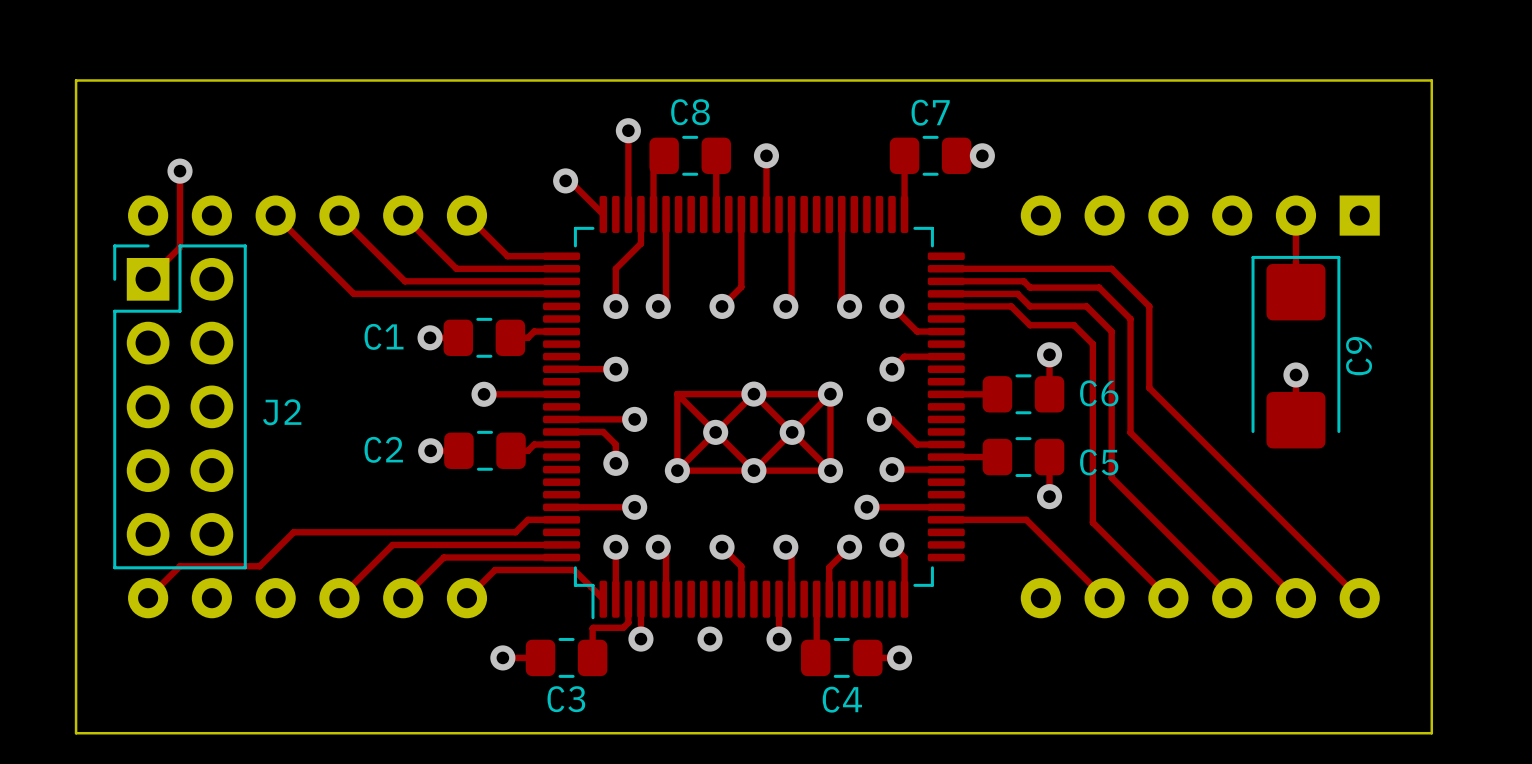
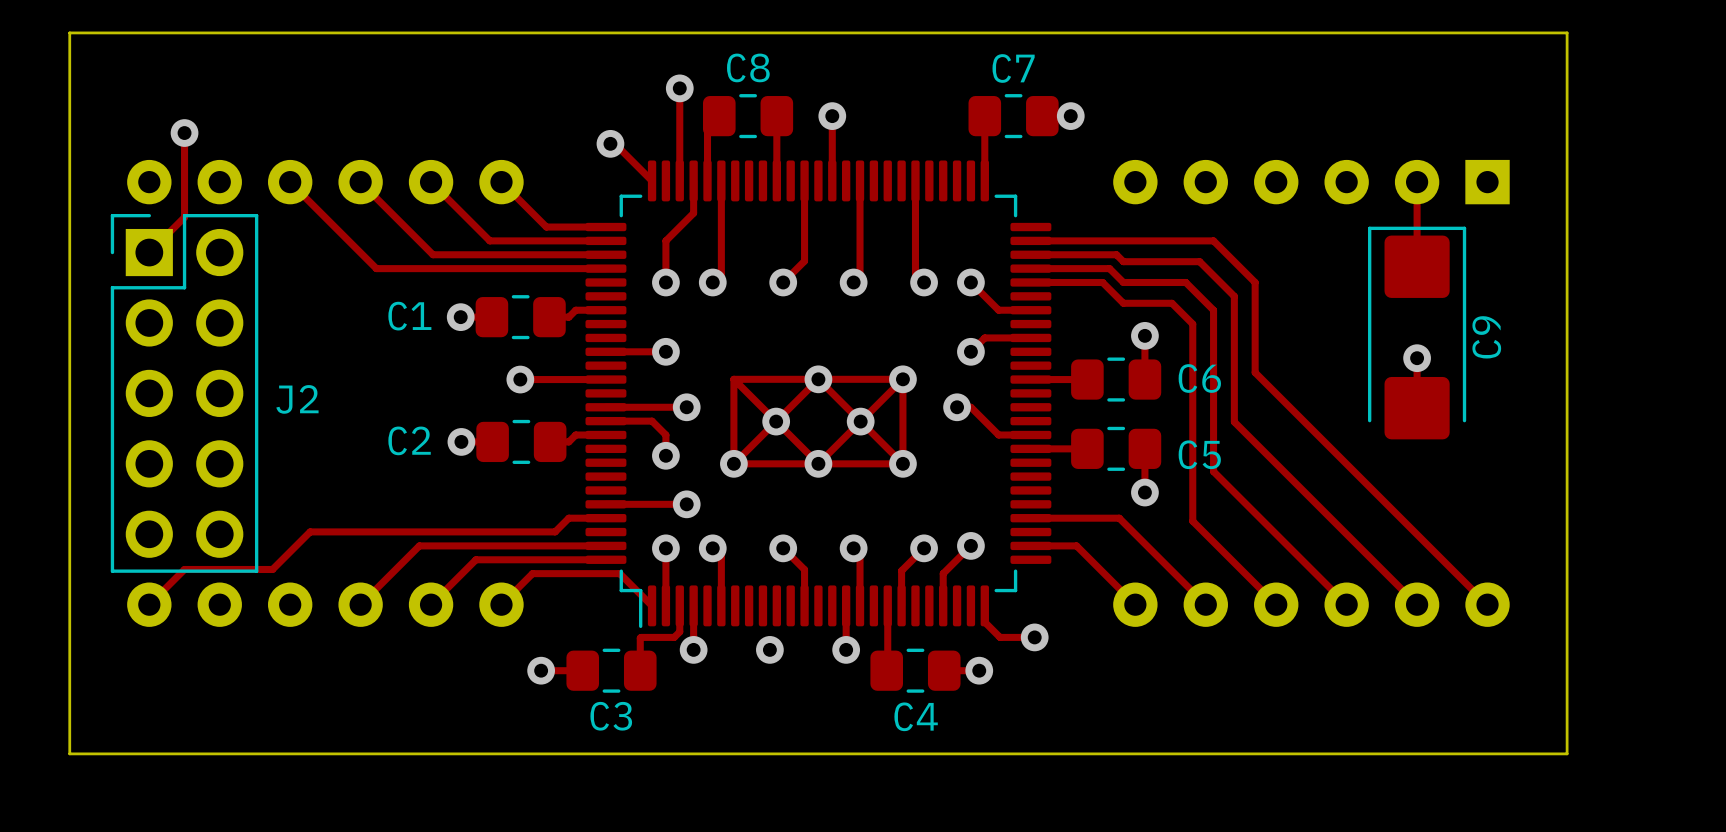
track: (892, 469) (946, 469) -> none
via: (892, 469) -> none
track: (866, 507) (946, 507) -> none
via: (866, 507) -> none
track: (892, 544) (904, 557) (904, 599) -> (970, 545) (943, 573) (943, 605)
track: none -> (1030, 545) (1076, 545) (1135, 604)
track: none -> (984, 605) (984, 622) (1000, 637) (1034, 637)
via: none -> (1034, 637)

